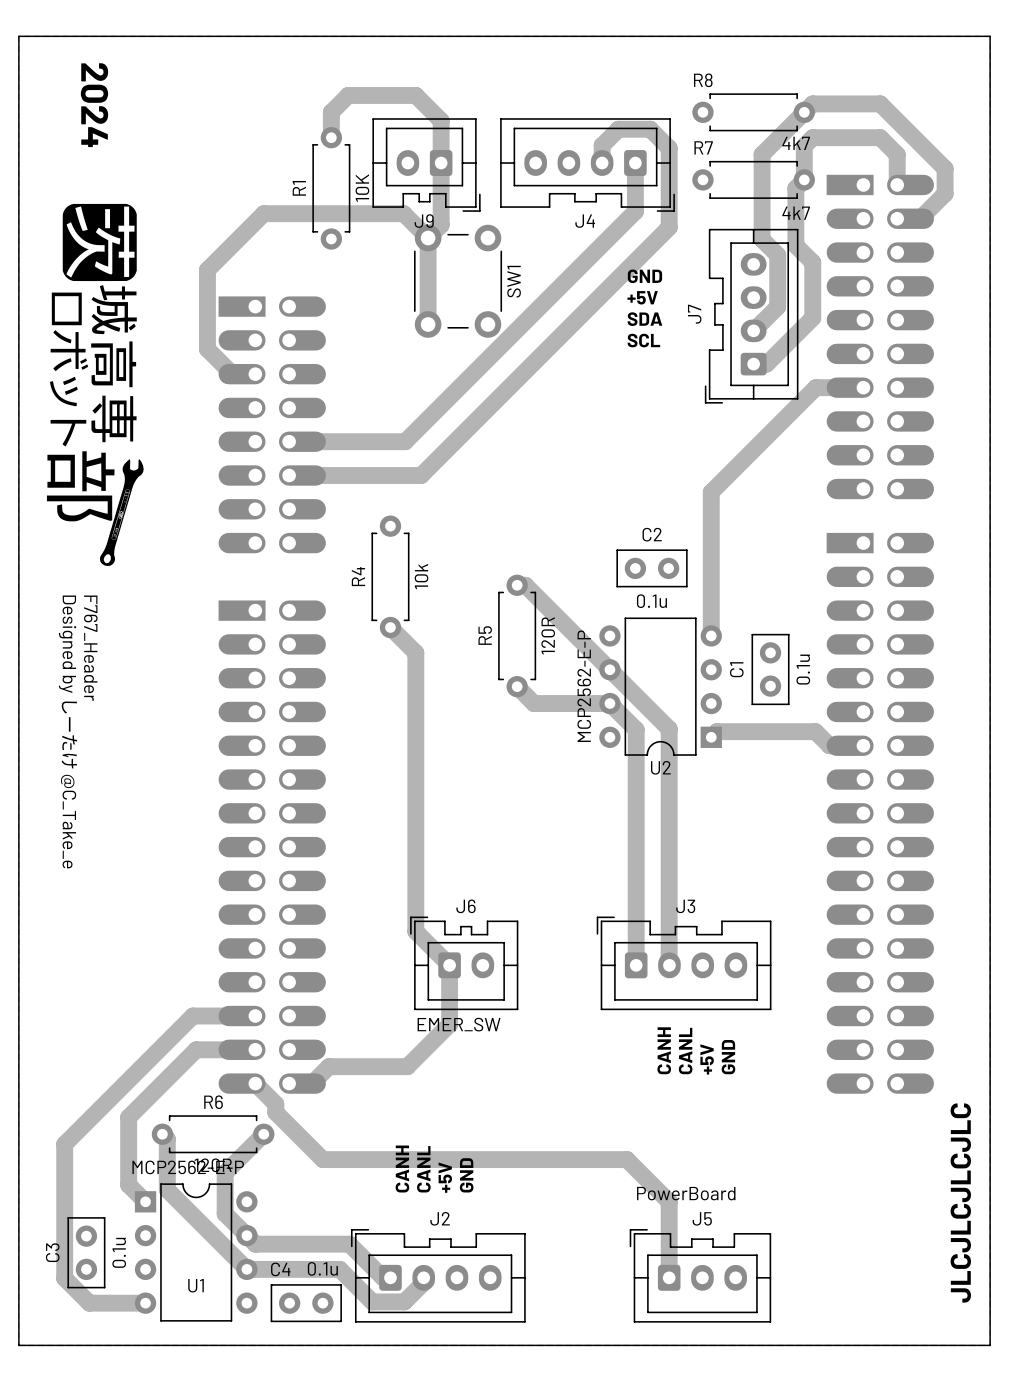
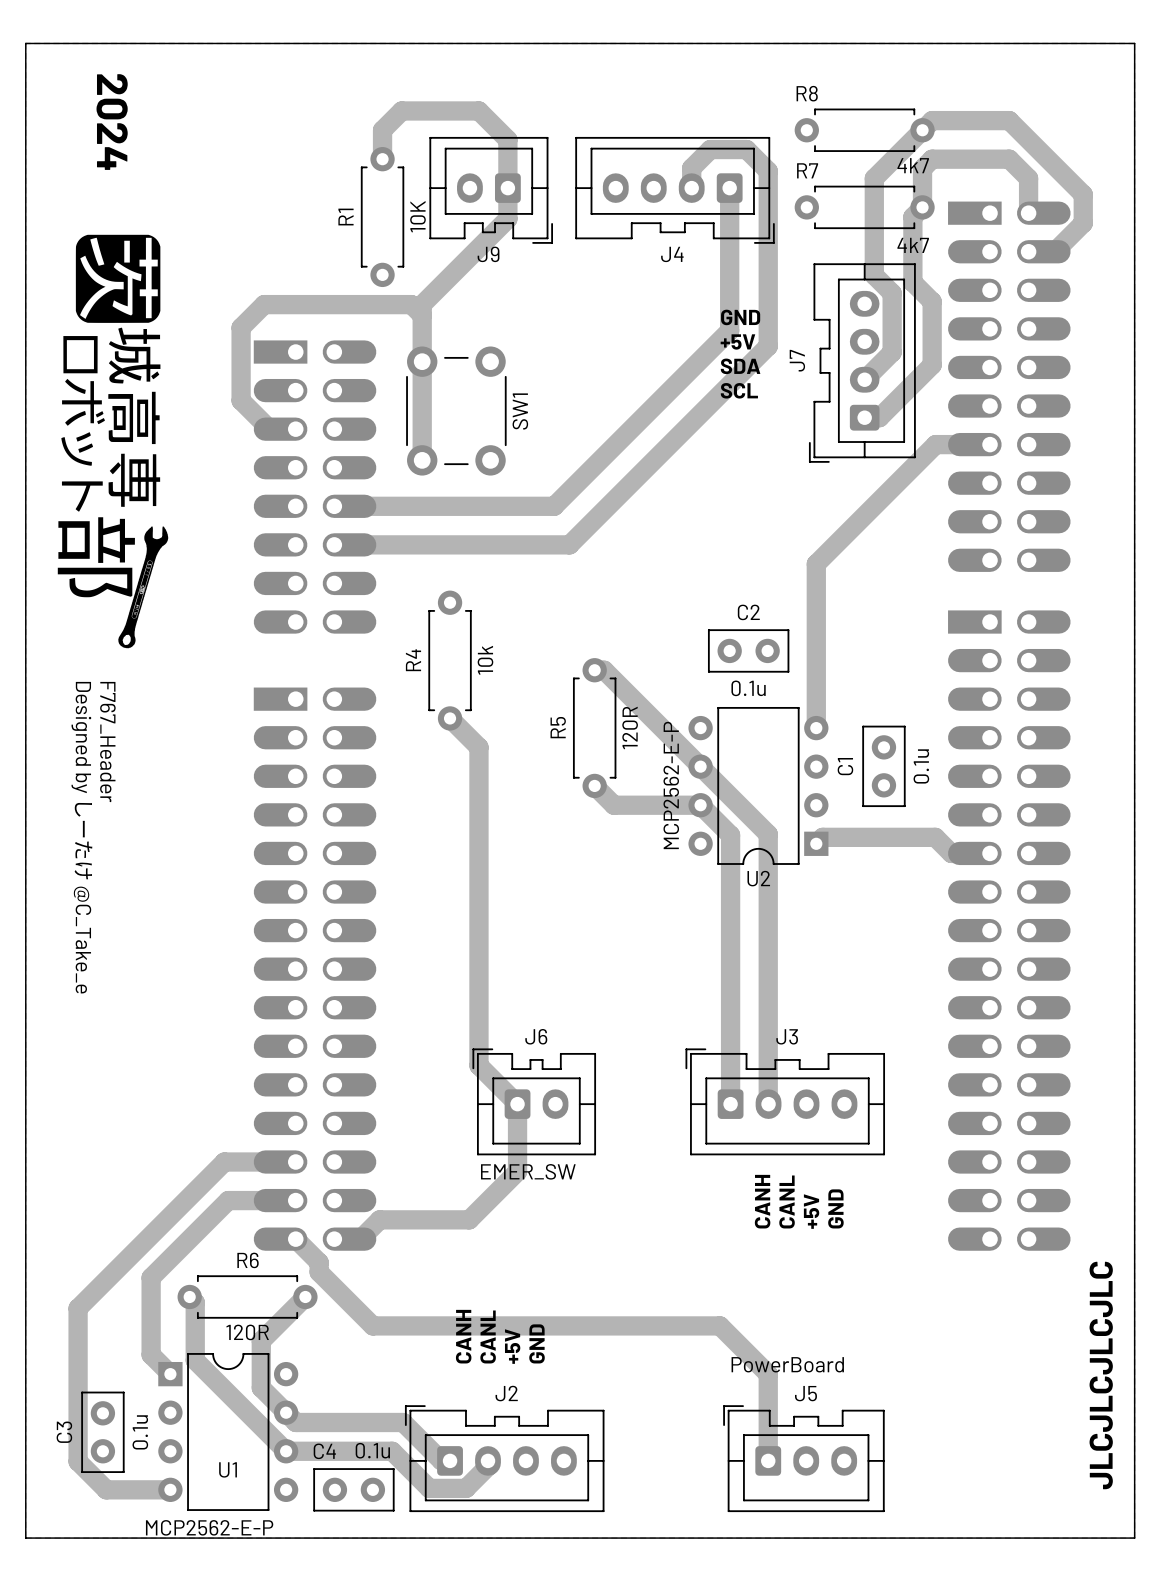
track: (441, 190) (441, 224) (428, 238) -> (507, 218) (422, 304) (422, 460)
track: (635, 211) (405, 441) -> (729, 243) (729, 330) (554, 506) (466, 506)
track: (669, 227) (421, 475) -> (768, 261) (768, 346) (569, 544) (485, 544)
track: (428, 238) (403, 213) (263, 213) (207, 270) (207, 285) -> (422, 315) (411, 304) (264, 304) (241, 327)
track: (428, 238) (428, 324) -> none
SW1 position: (458, 281) -> (456, 411)
U1 value position: MCP2562-E-P (188, 1167) -> MCP2562-E-P (209, 1527)

